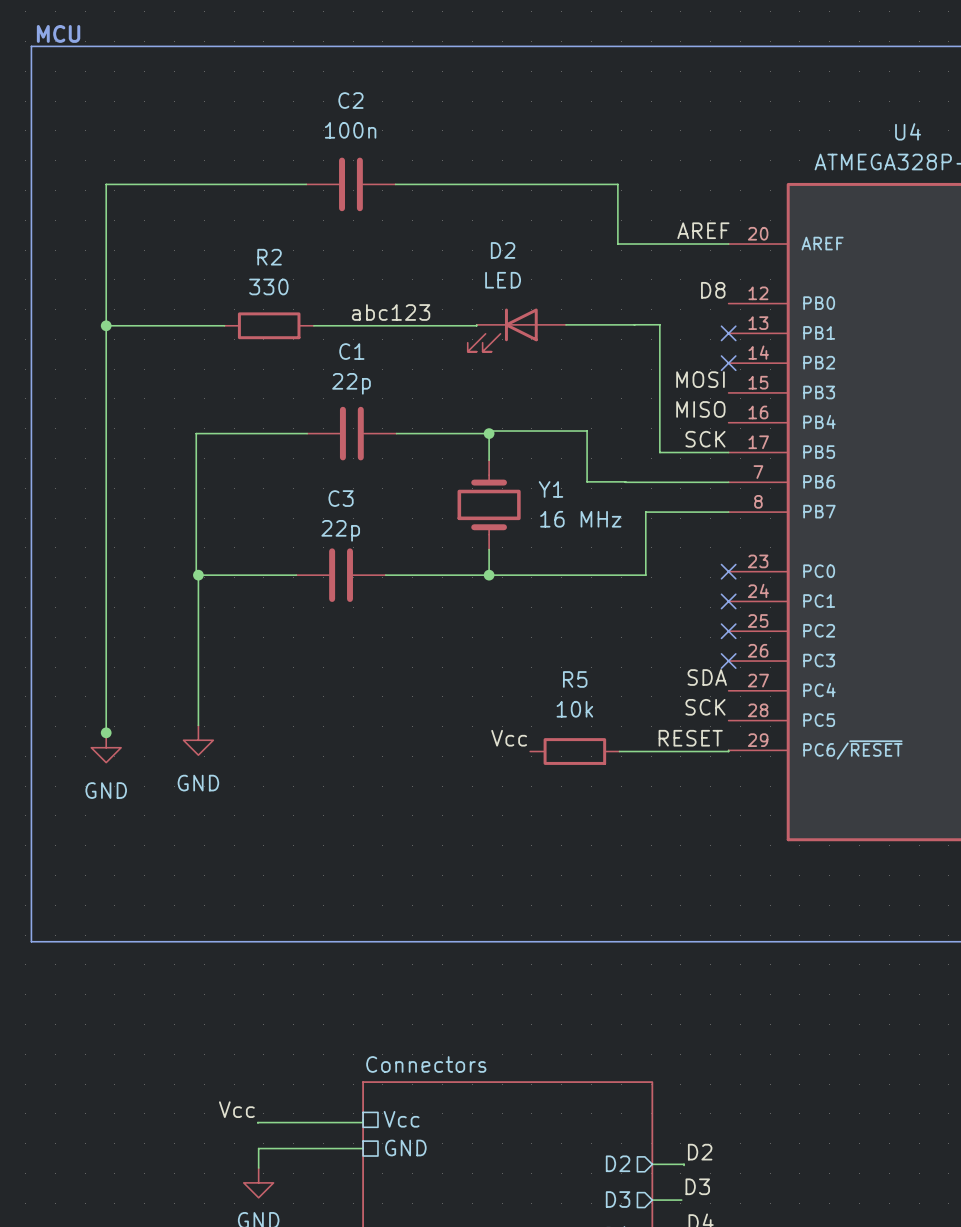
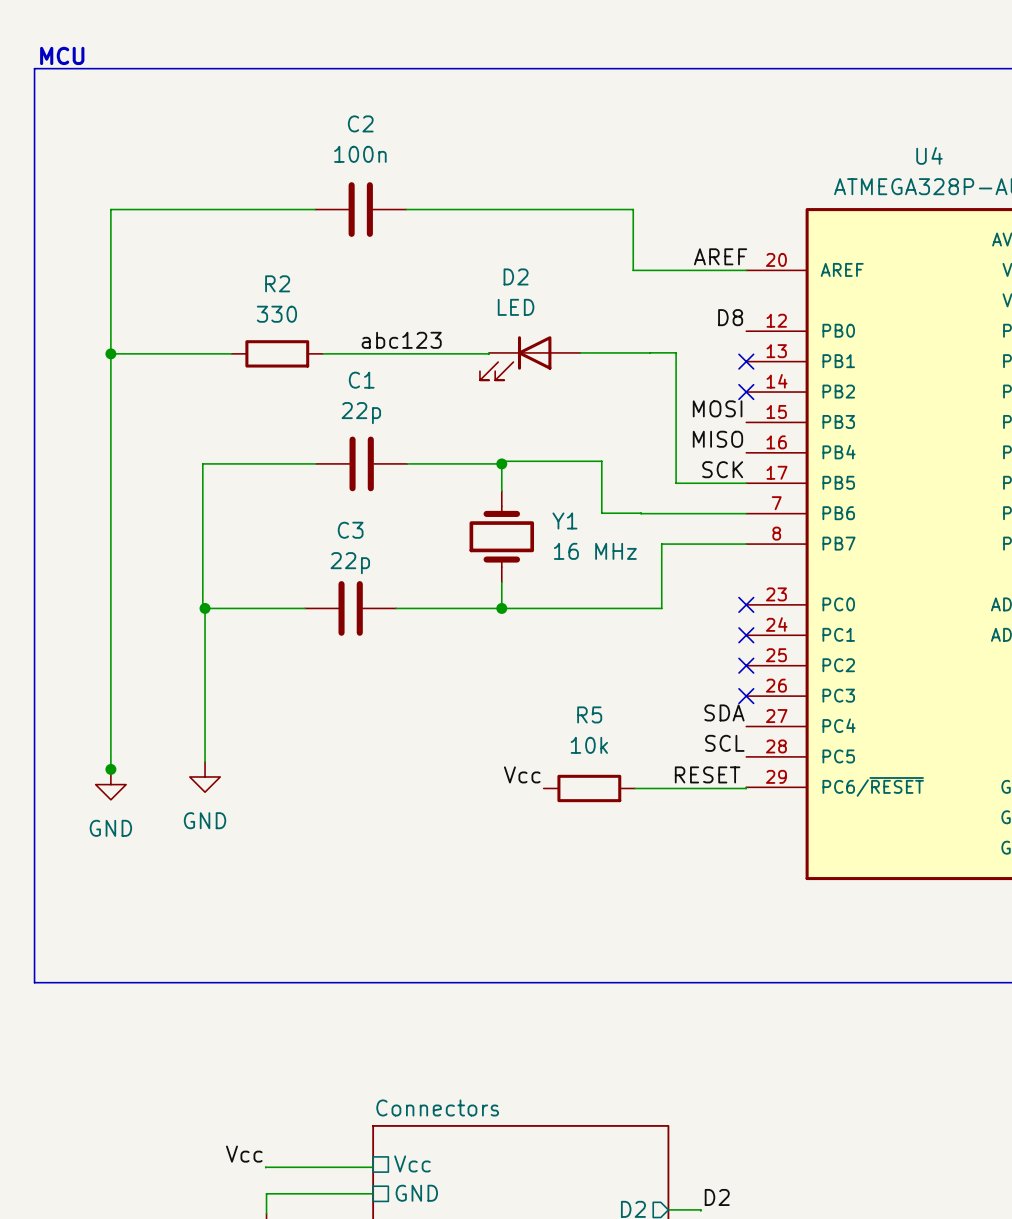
label: SCK (705, 707) -> SCL (724, 743)

